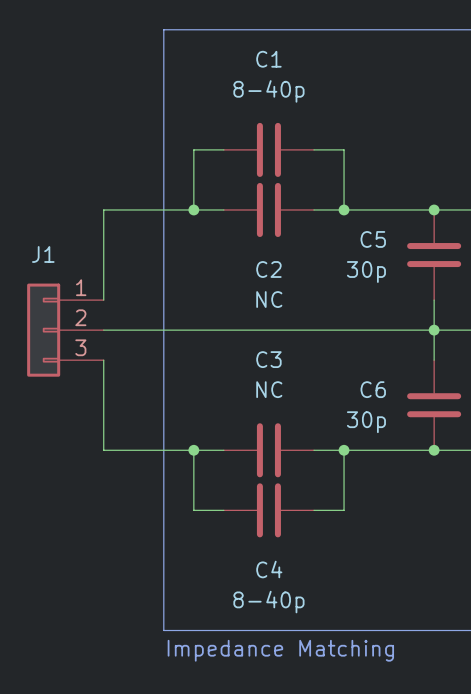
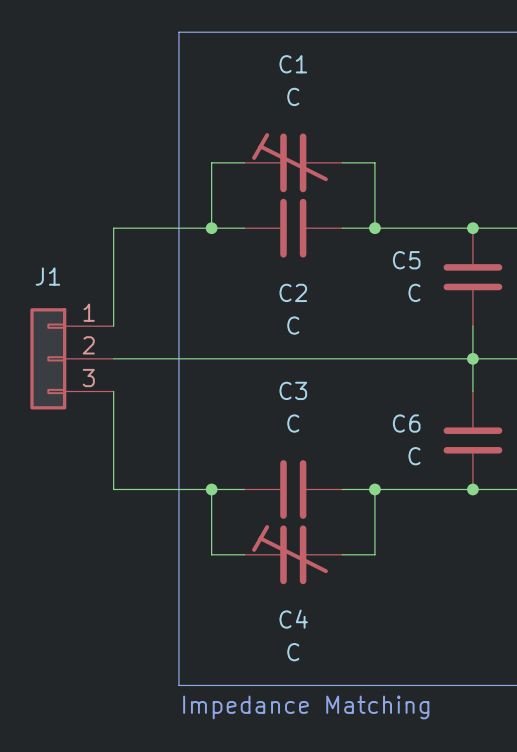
C1 value: 8-40p (268, 91) -> C (293, 96)
C1 symbol: [223, 122, 314, 177] -> [244, 133, 343, 193]
C5 value: 30p (366, 272) -> C (414, 292)
C2 value: NC (269, 299) -> C (293, 325)
C3 value: NC (269, 389) -> C (293, 423)
C6 value: 30p (366, 422) -> C (414, 456)
C4 symbol: [223, 483, 314, 538] -> [244, 525, 343, 585]
C4 value: 8-40p (268, 602) -> C (293, 652)

